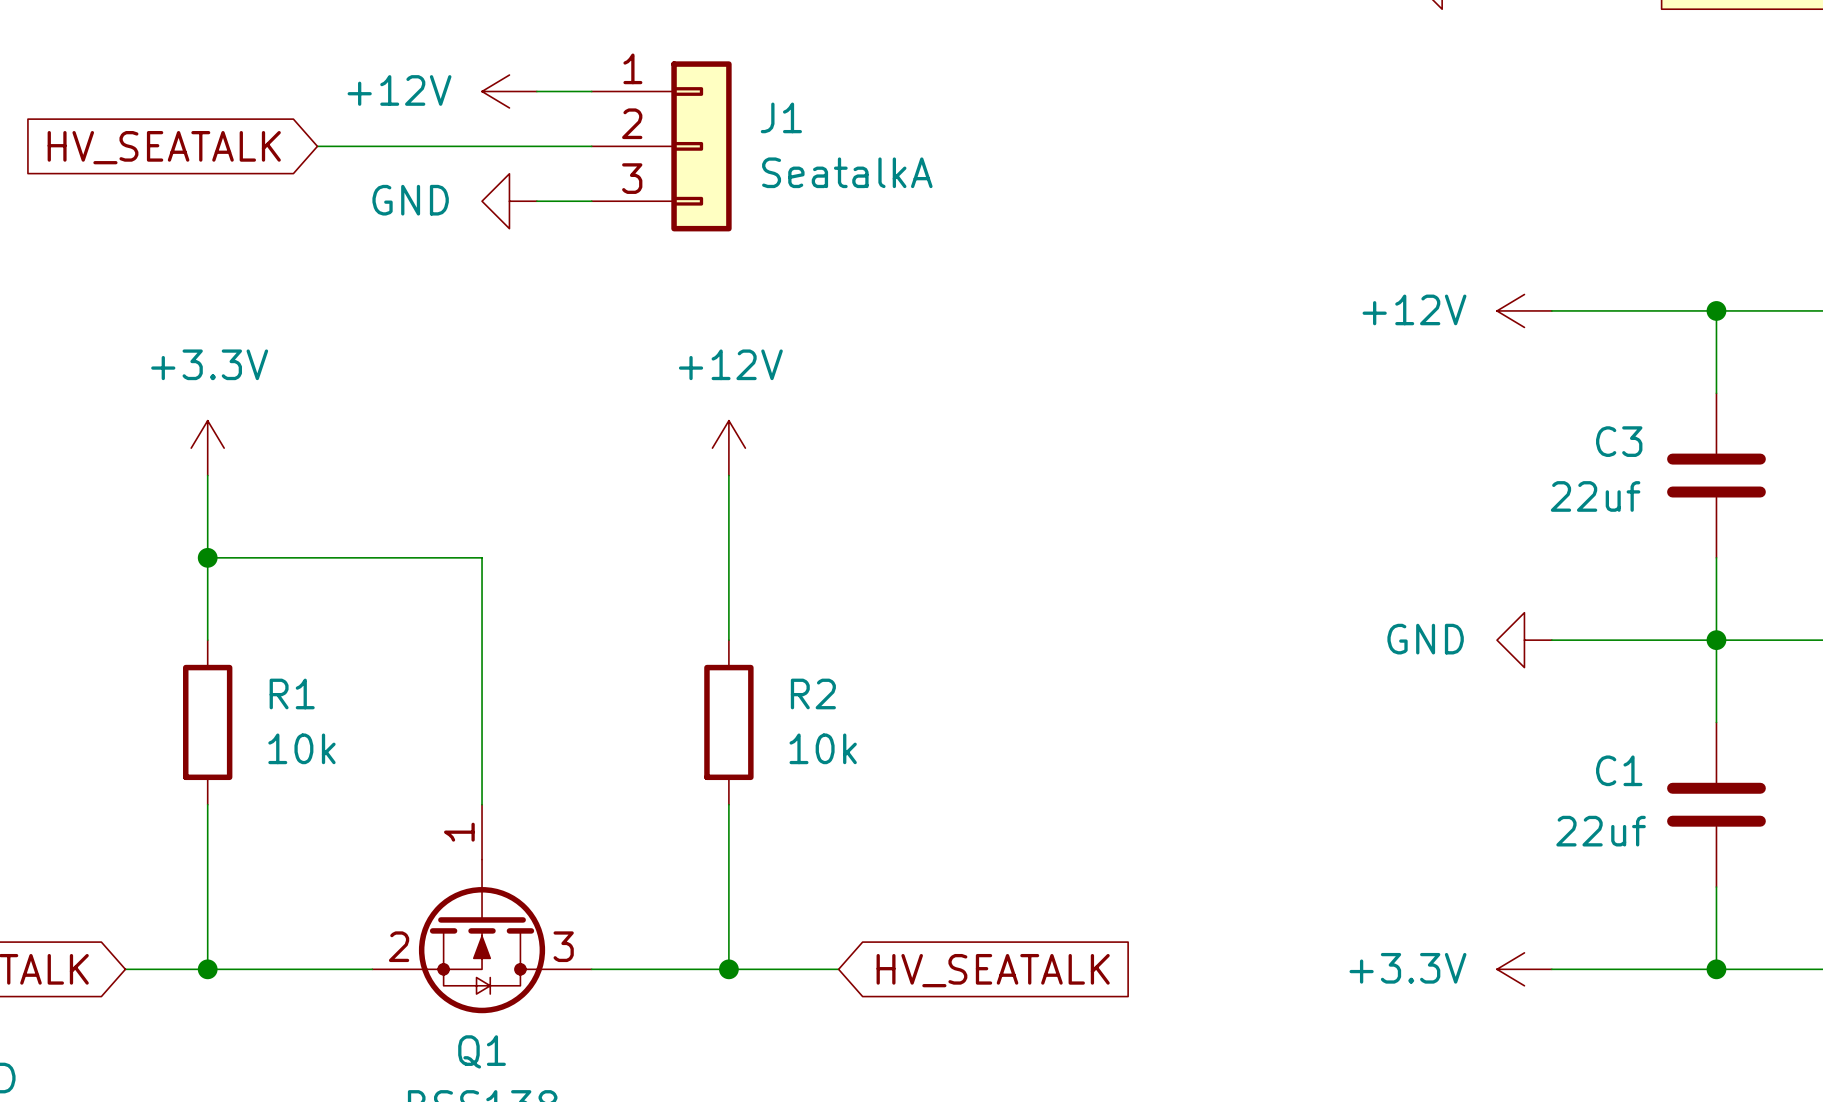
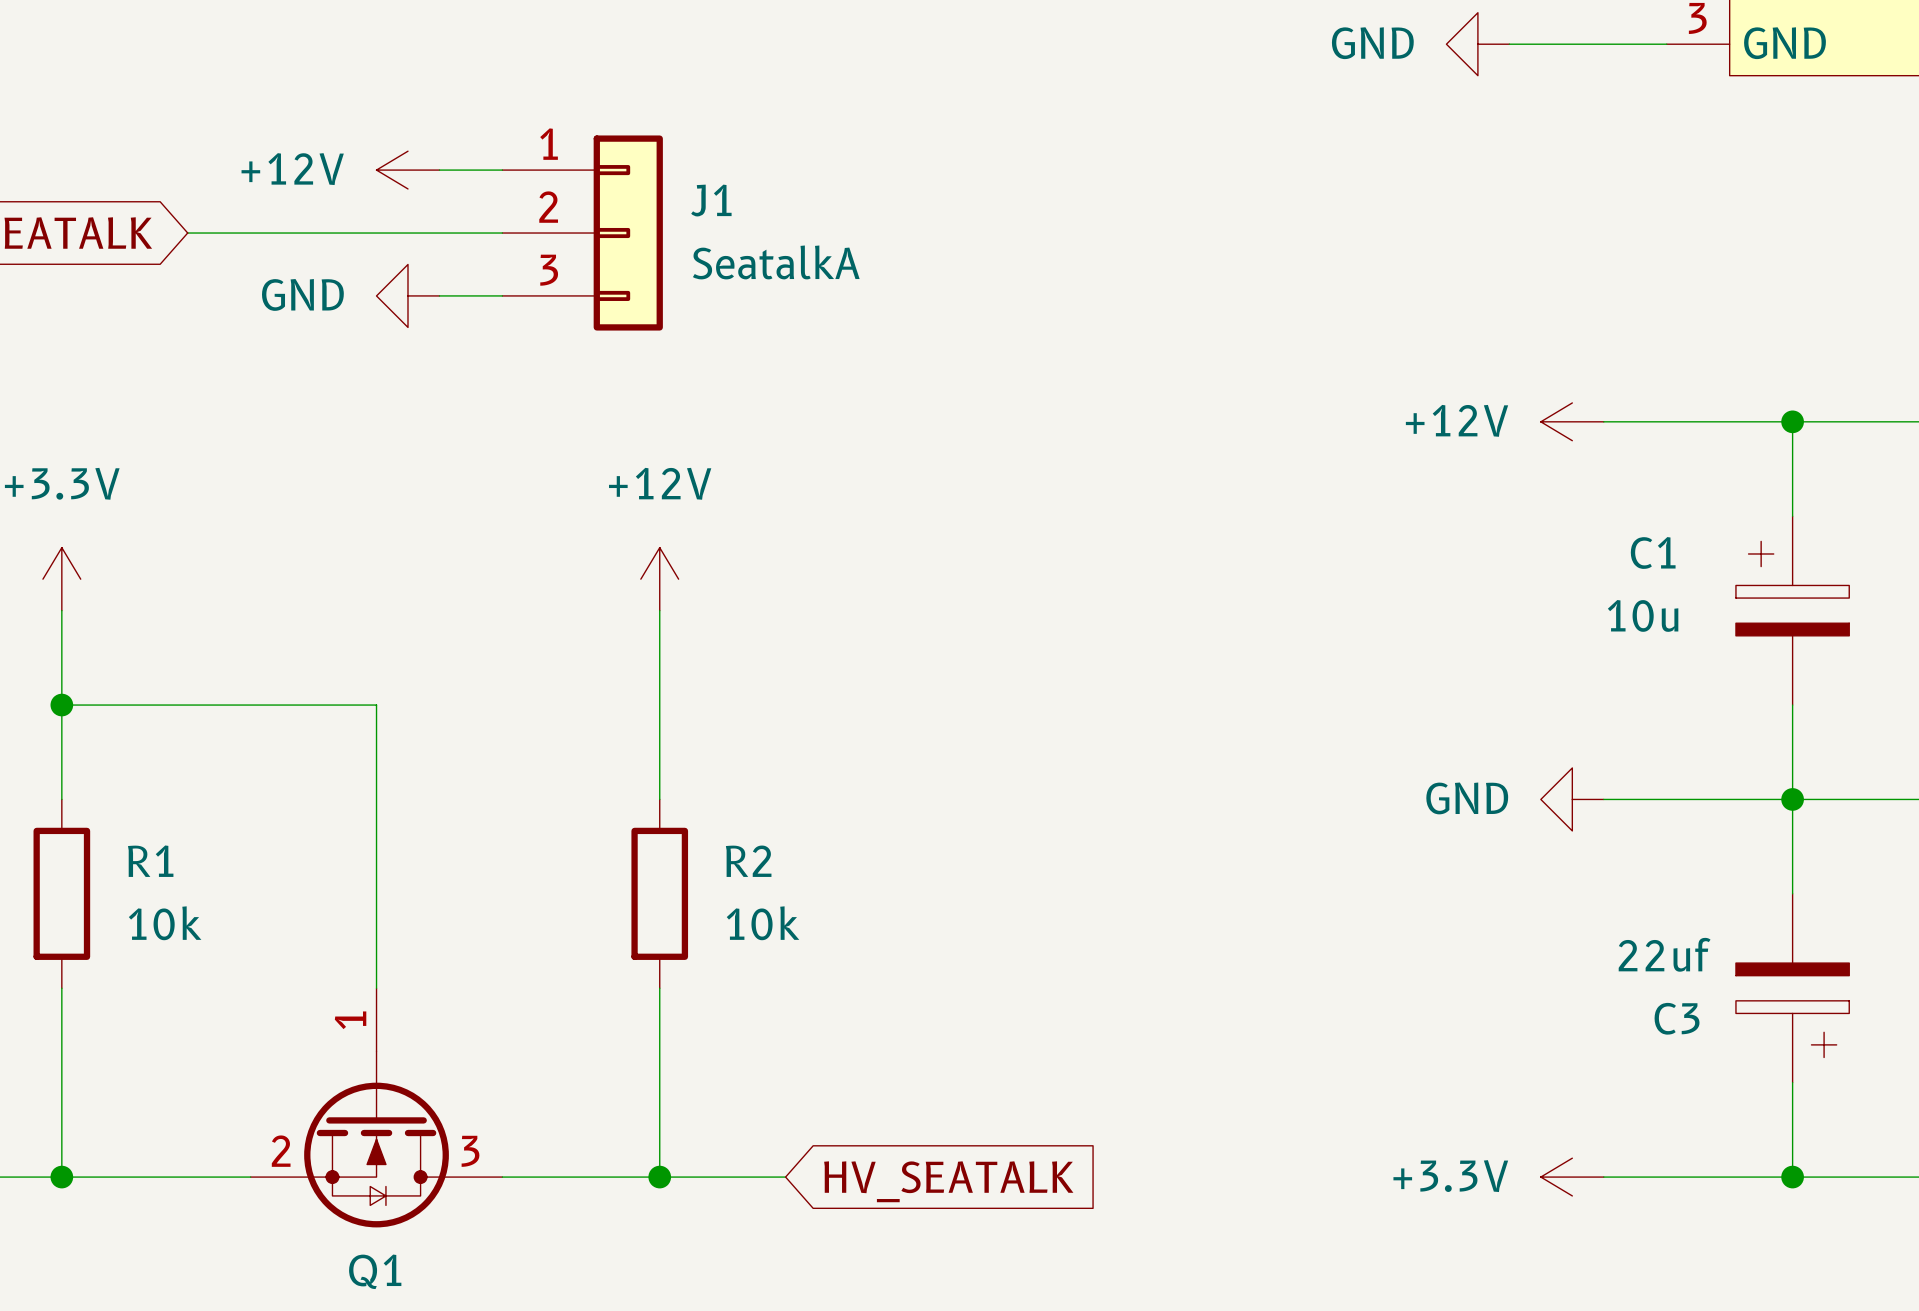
C3 symbol: [1667, 393, 1766, 558] -> [1735, 893, 1850, 1083]
C3 name position: C3 (1619, 441) -> C3 (1677, 1018)
C3 value position: 22uf (1595, 496) -> 22uf (1664, 954)
C1 symbol: [1667, 722, 1766, 888] -> [1735, 516, 1850, 706]
C1 value: 22uf (1601, 831) -> 10u (1643, 615)

